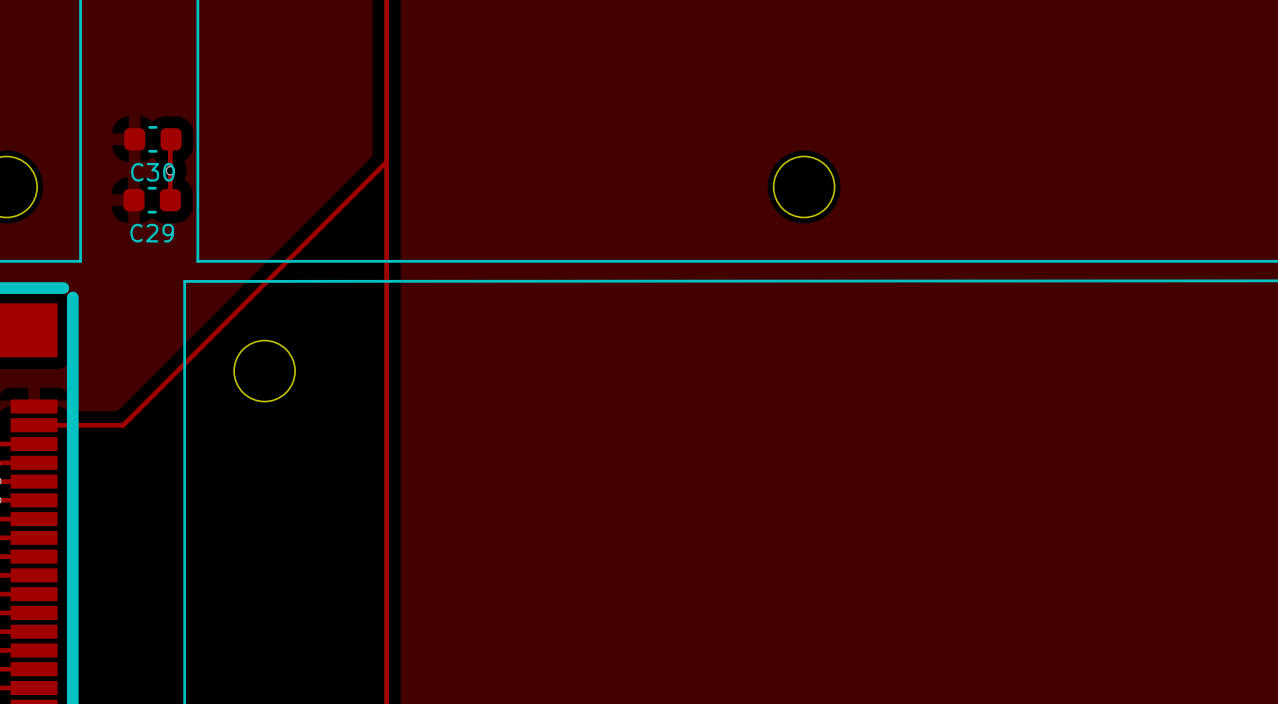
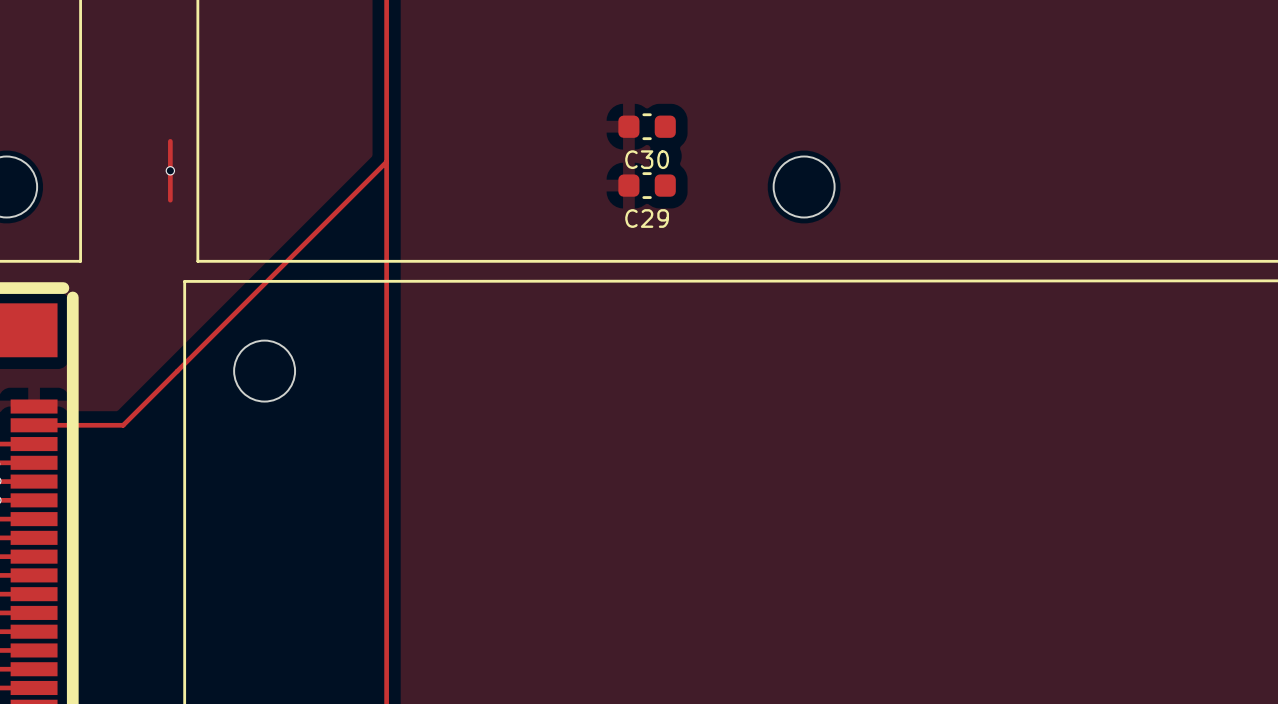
C30 position: (152, 139) -> (647, 126)
C29 position: (152, 200) -> (647, 185)

